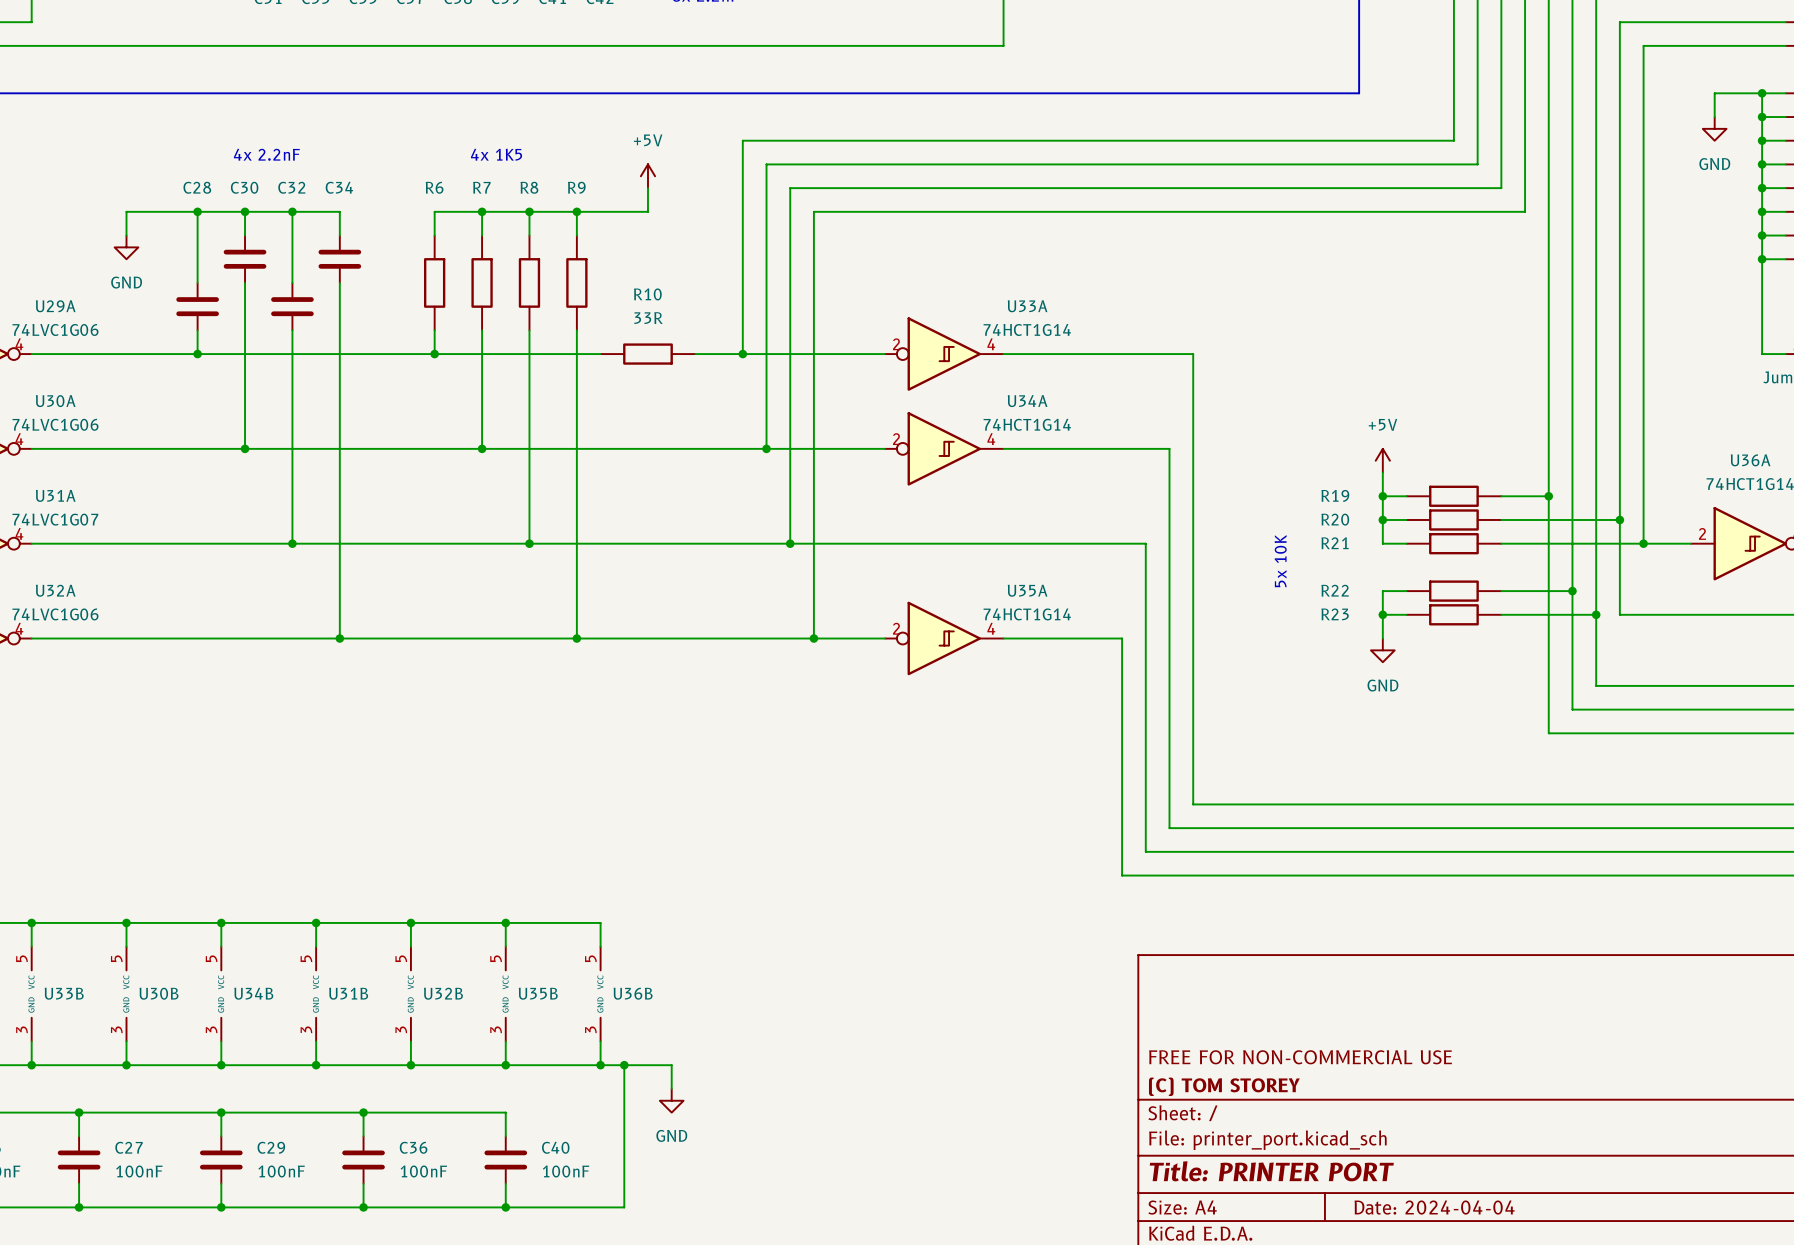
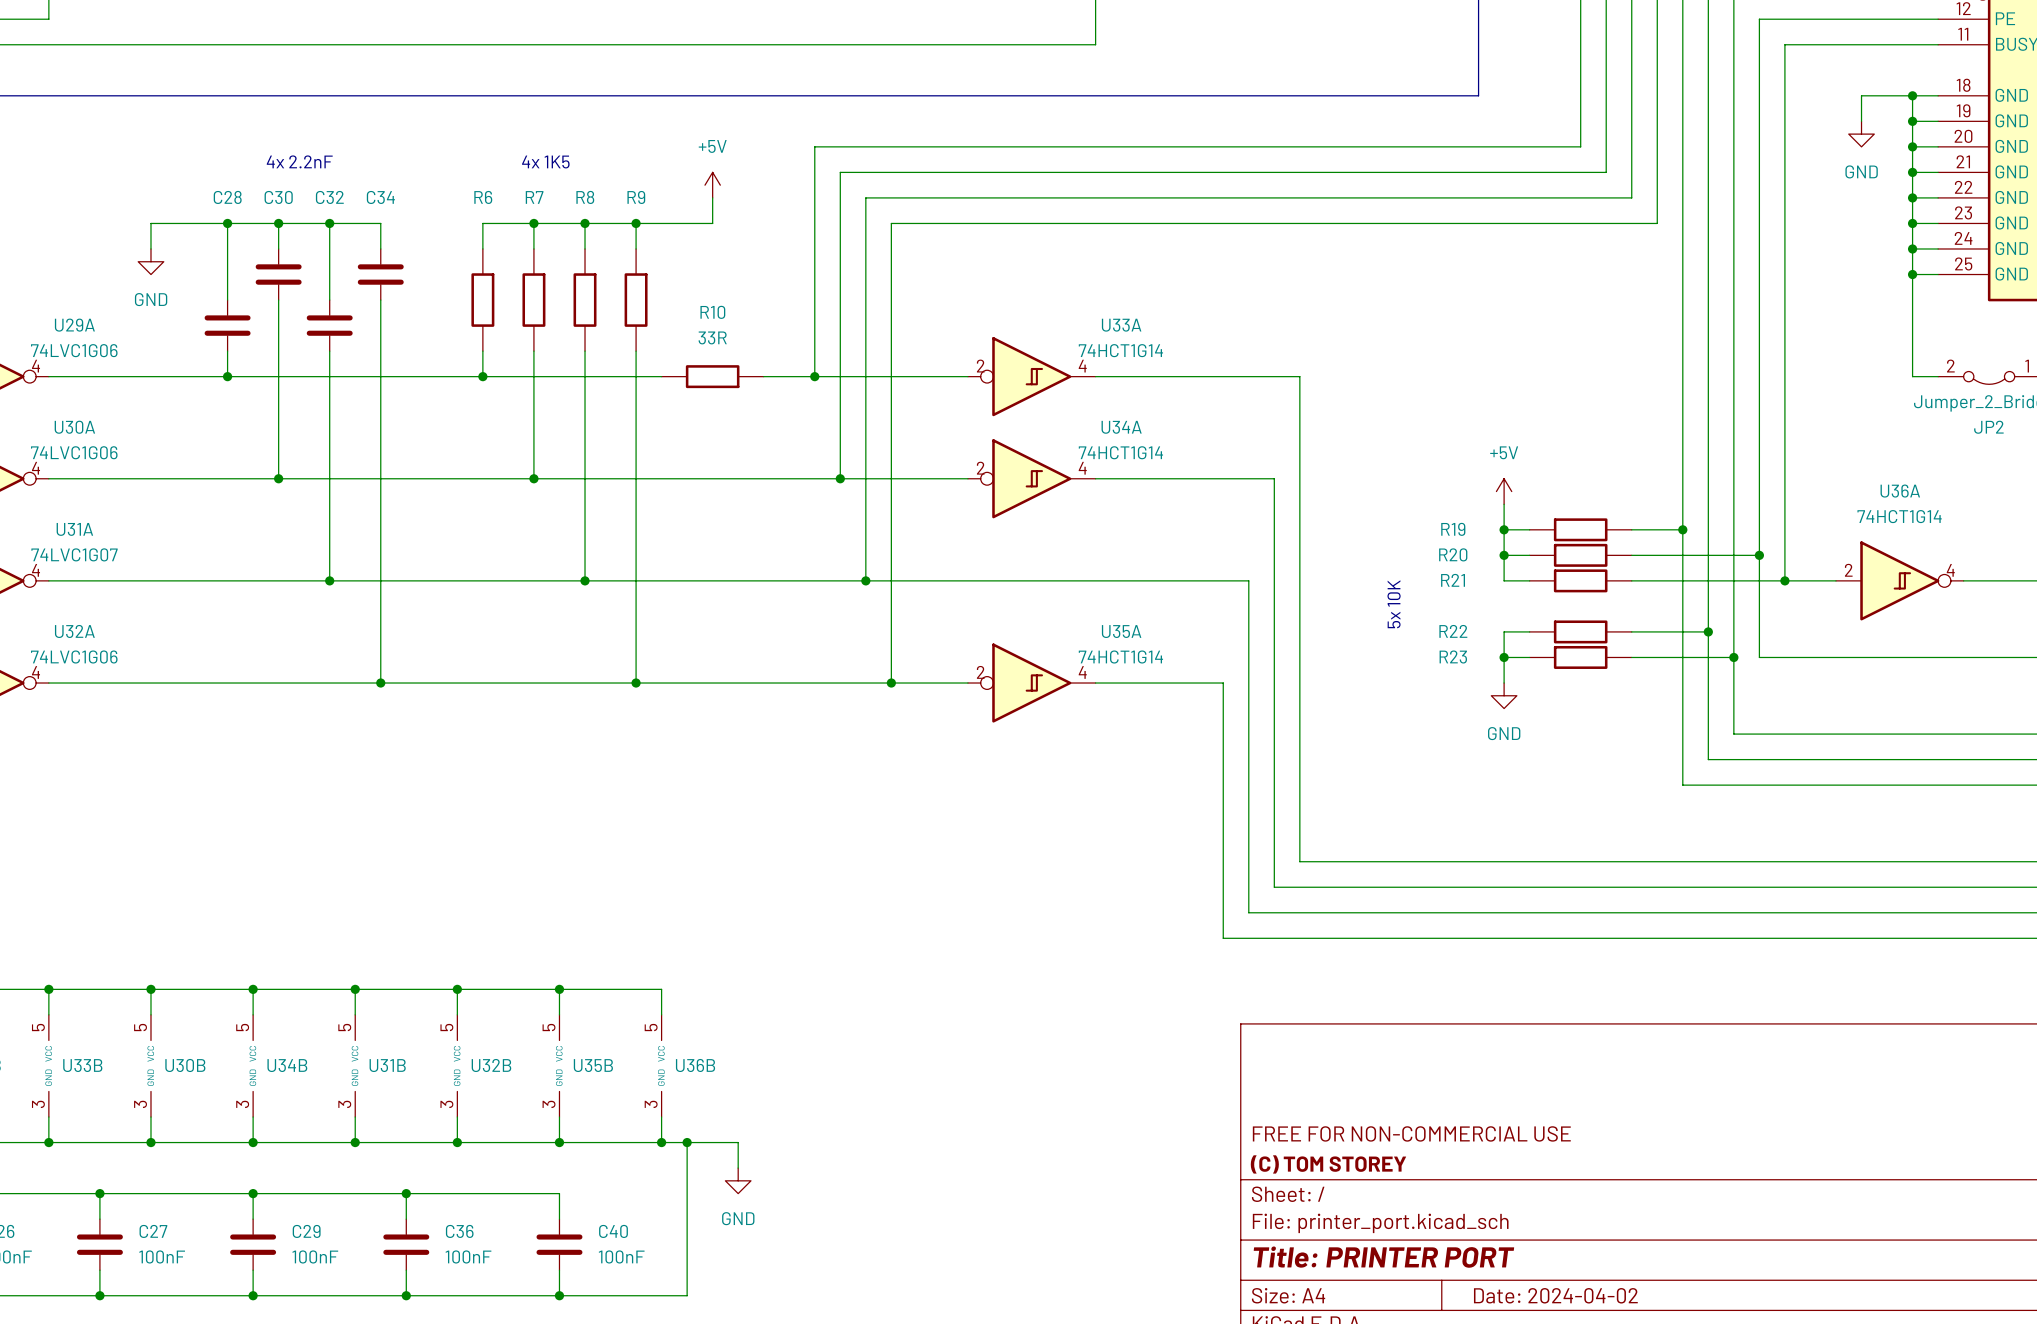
title block: Date: 2024-04-04 (1434, 1207) -> Date: 2024-04-02 (1555, 1295)

